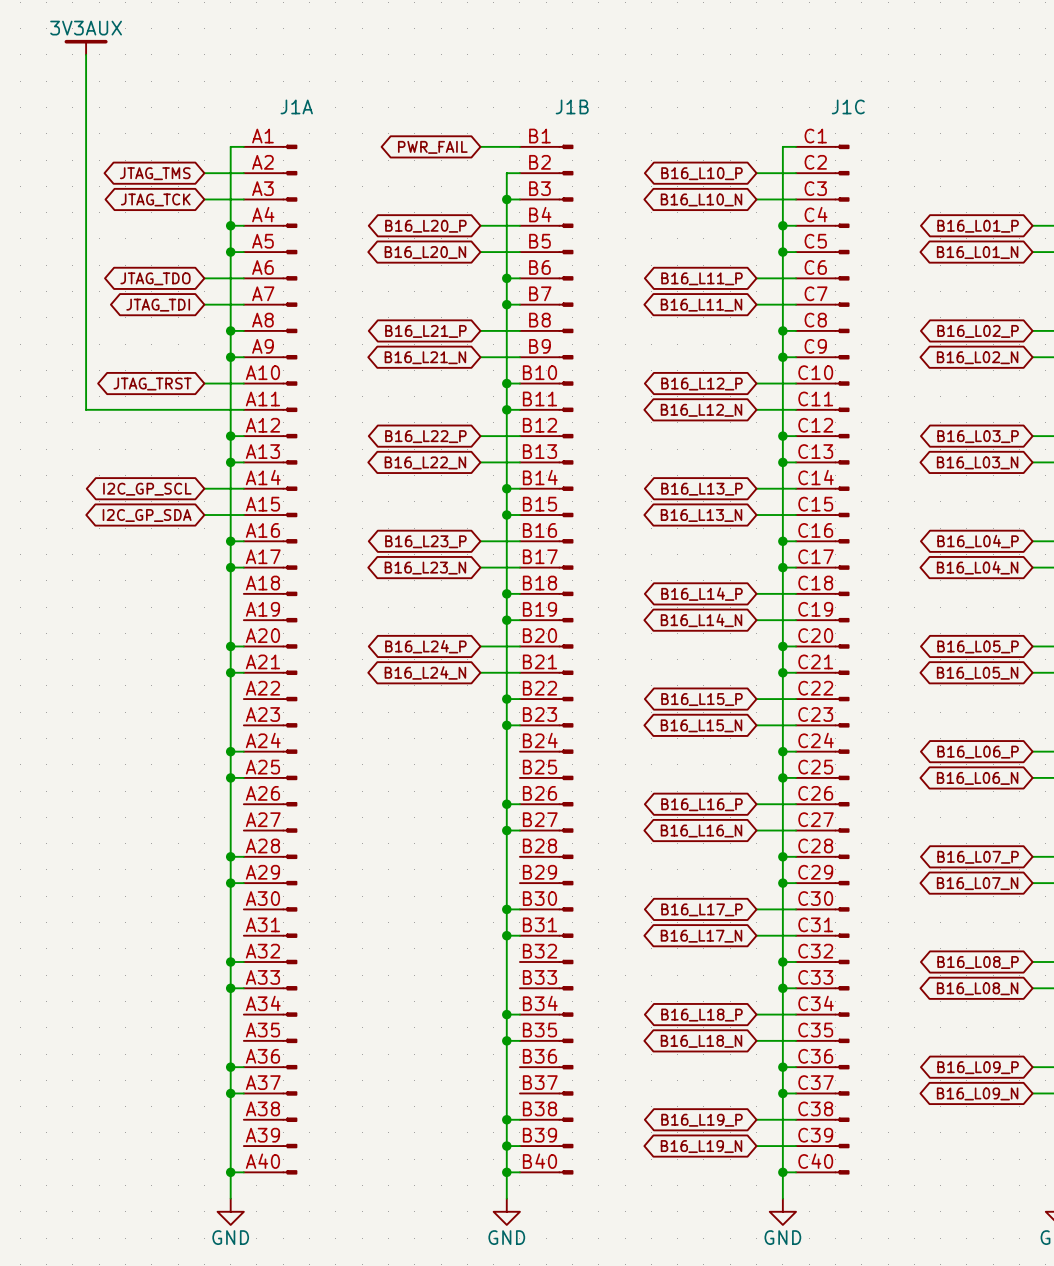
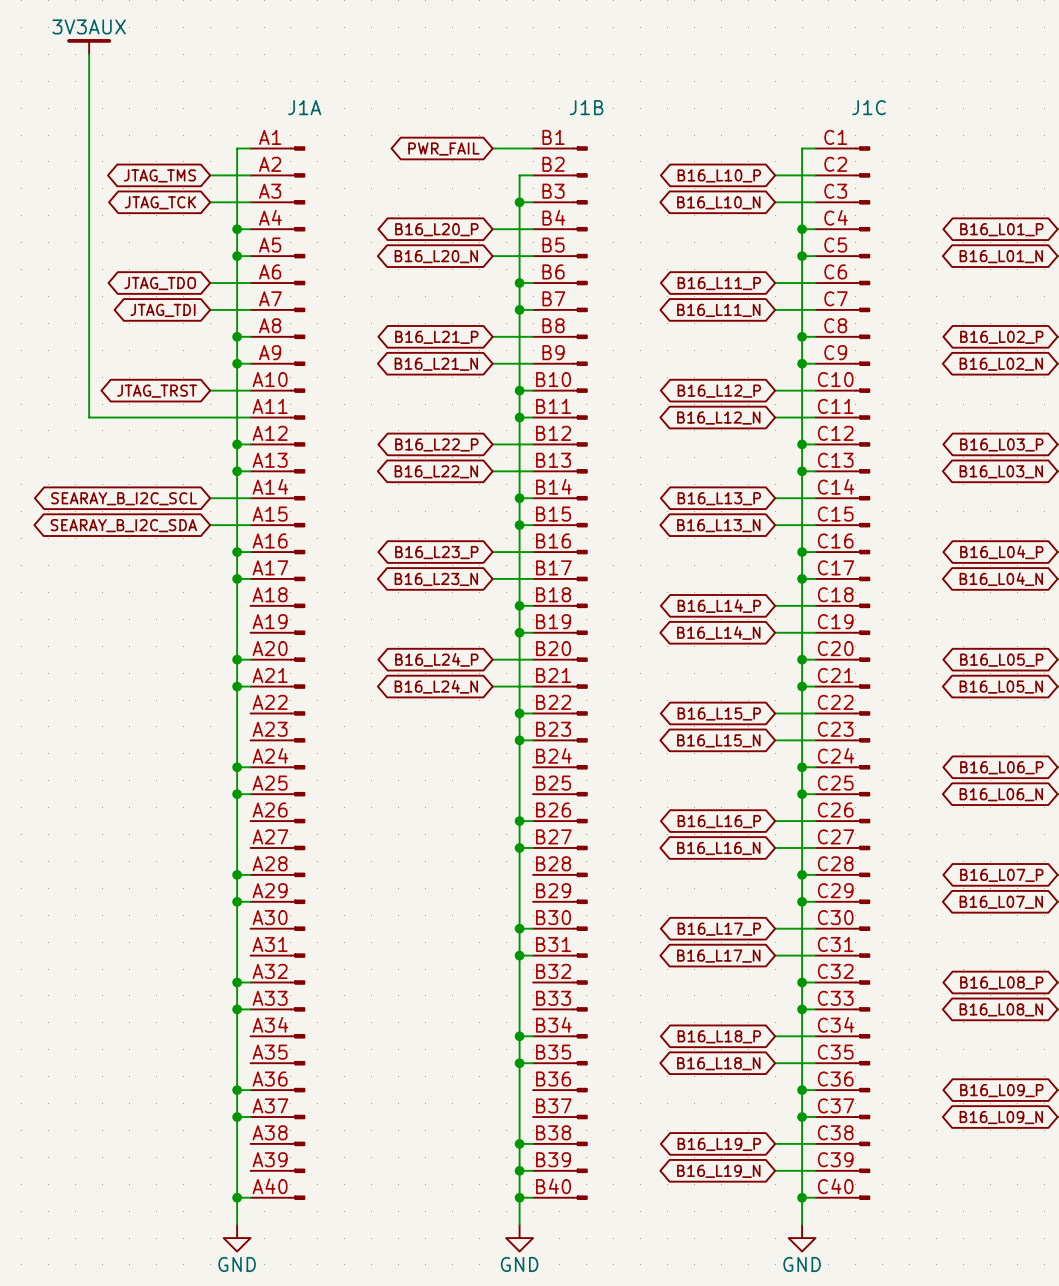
global label: I2C_GP_SCL (147, 489) -> SEARAY_B_I2C_SCL (124, 498)
global label: I2C_GP_SDA (147, 515) -> SEARAY_B_I2C_SDA (123, 525)

